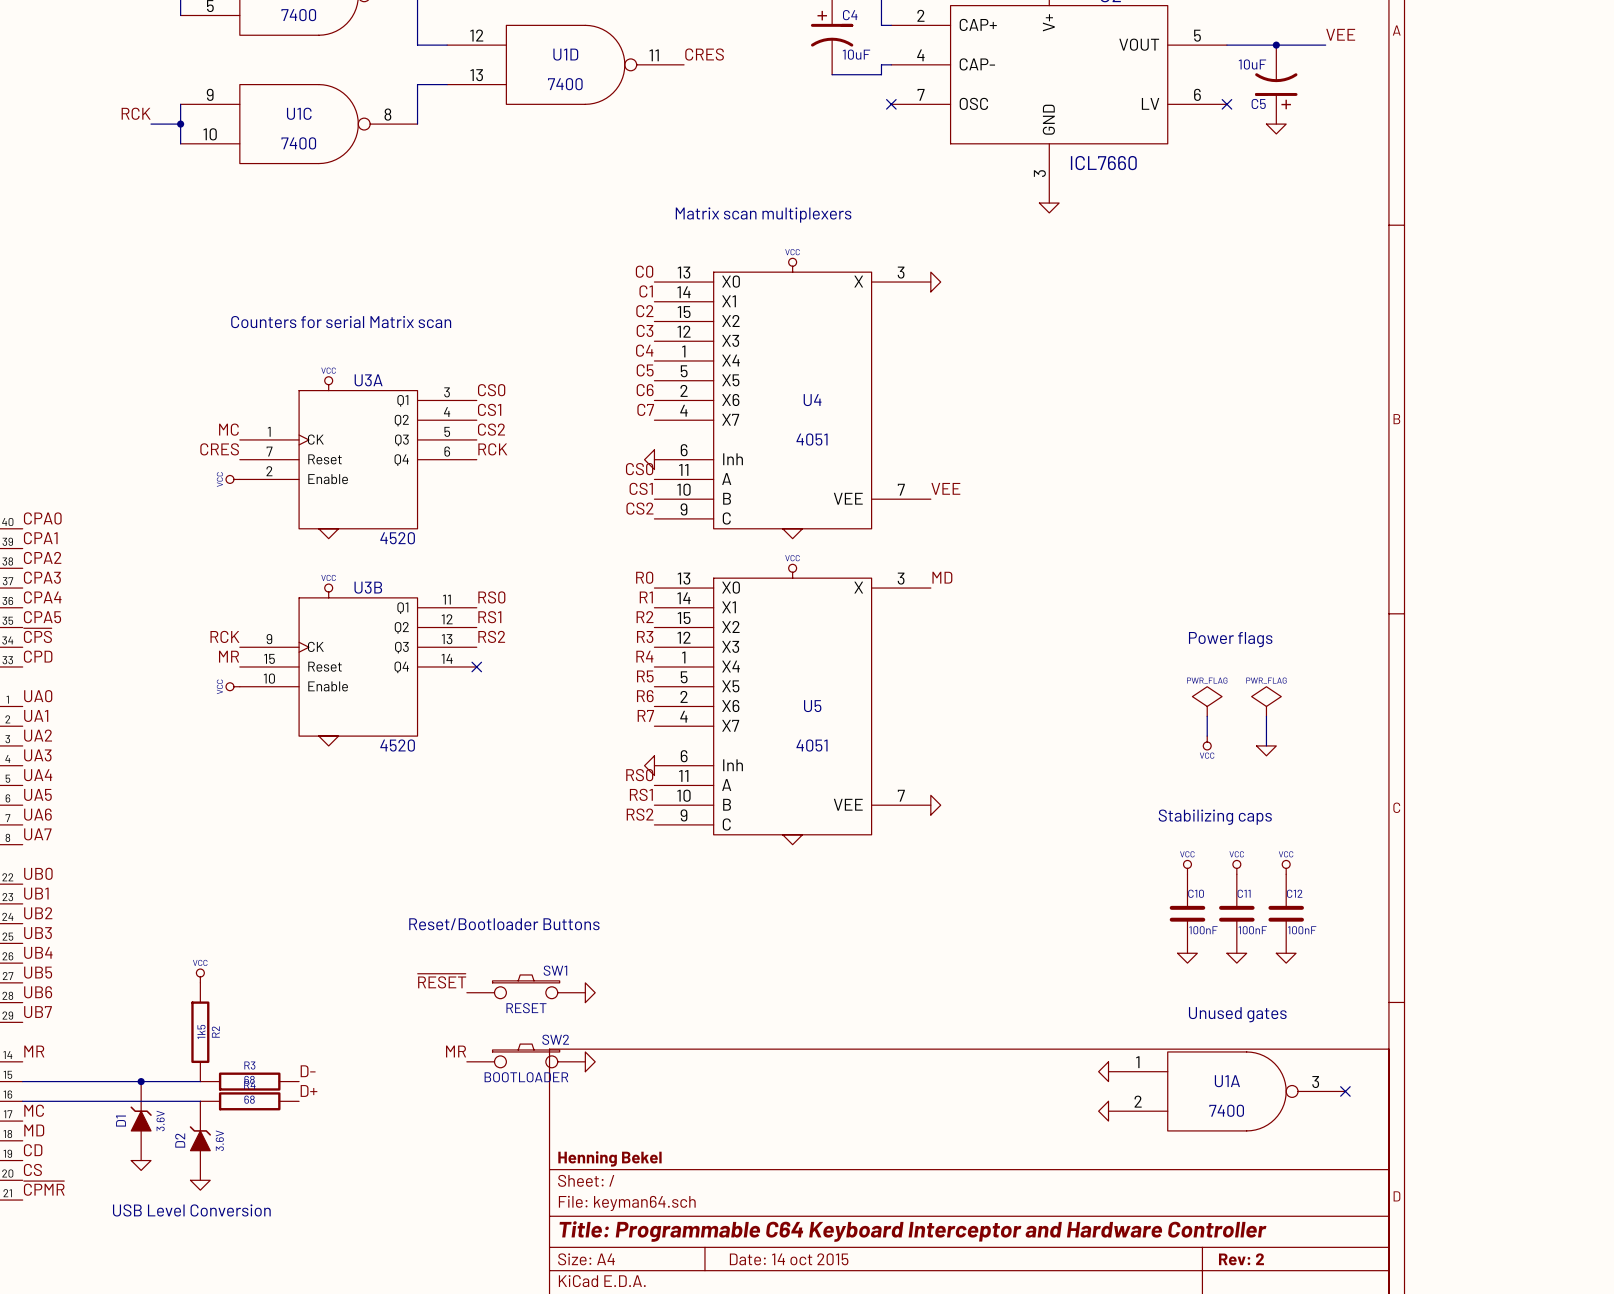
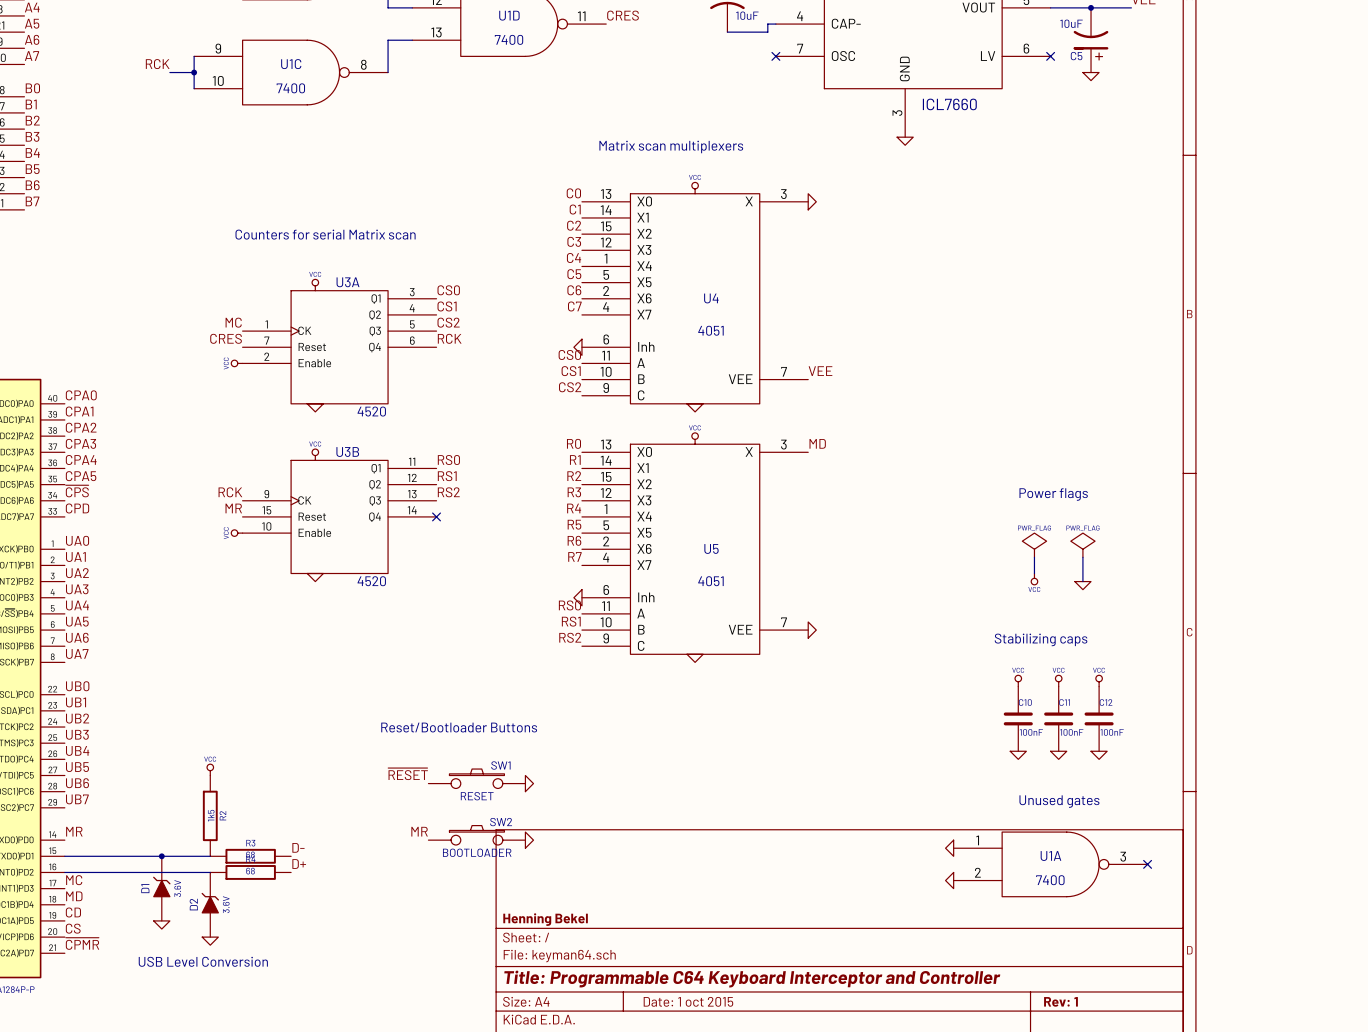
title block: Title: Programmable C64 Keyboard Interceptor and Hardware Controller (913, 1231) -> Title: Programmable C64 Keyboard Interceptor and Controller (752, 979)
title block: Date: 14 oct 2015 (789, 1259) -> Date: 1 oct 2015 (688, 1001)
title block: Rev: 2 (1241, 1259) -> Rev: 1 (1060, 1001)

